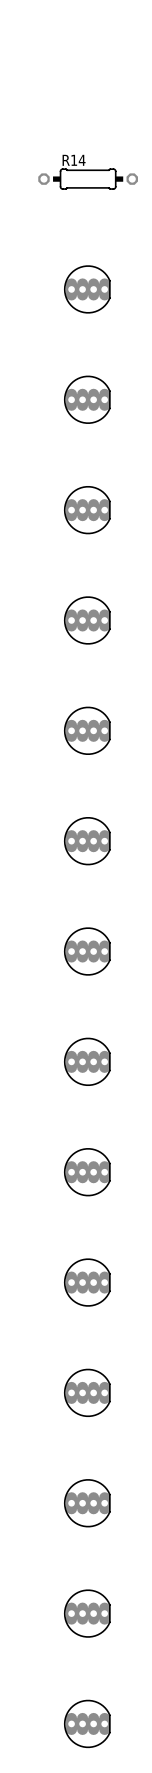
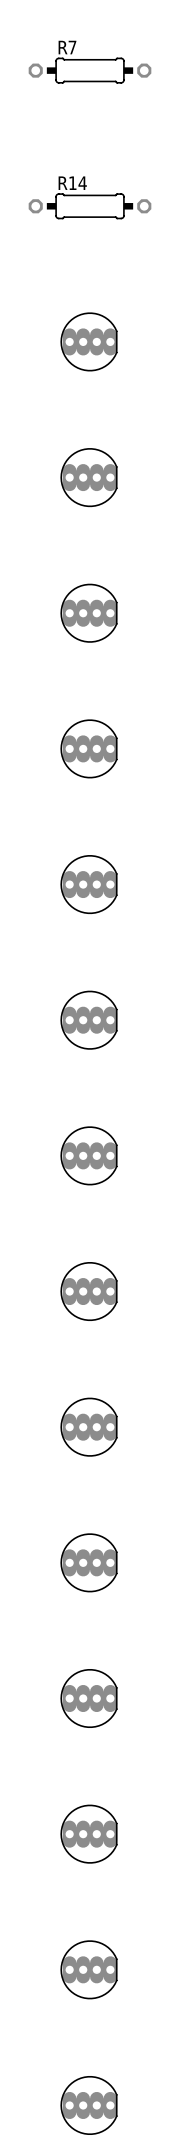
R7: none -> (90, 70)

